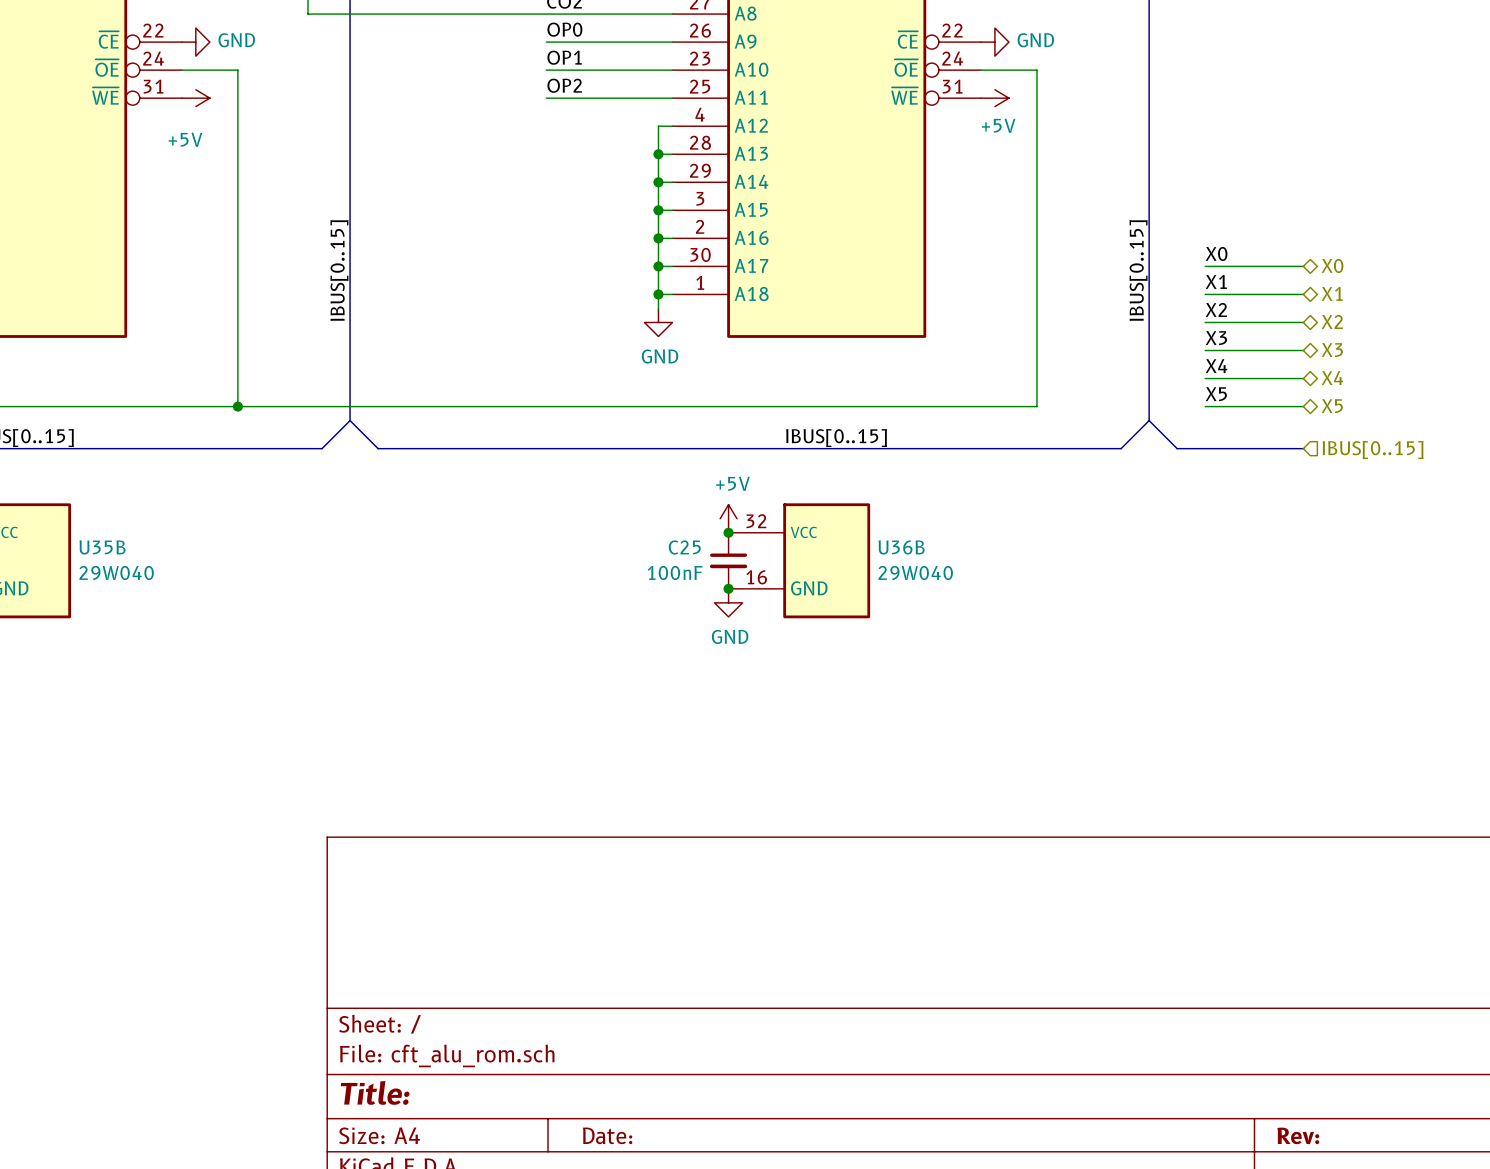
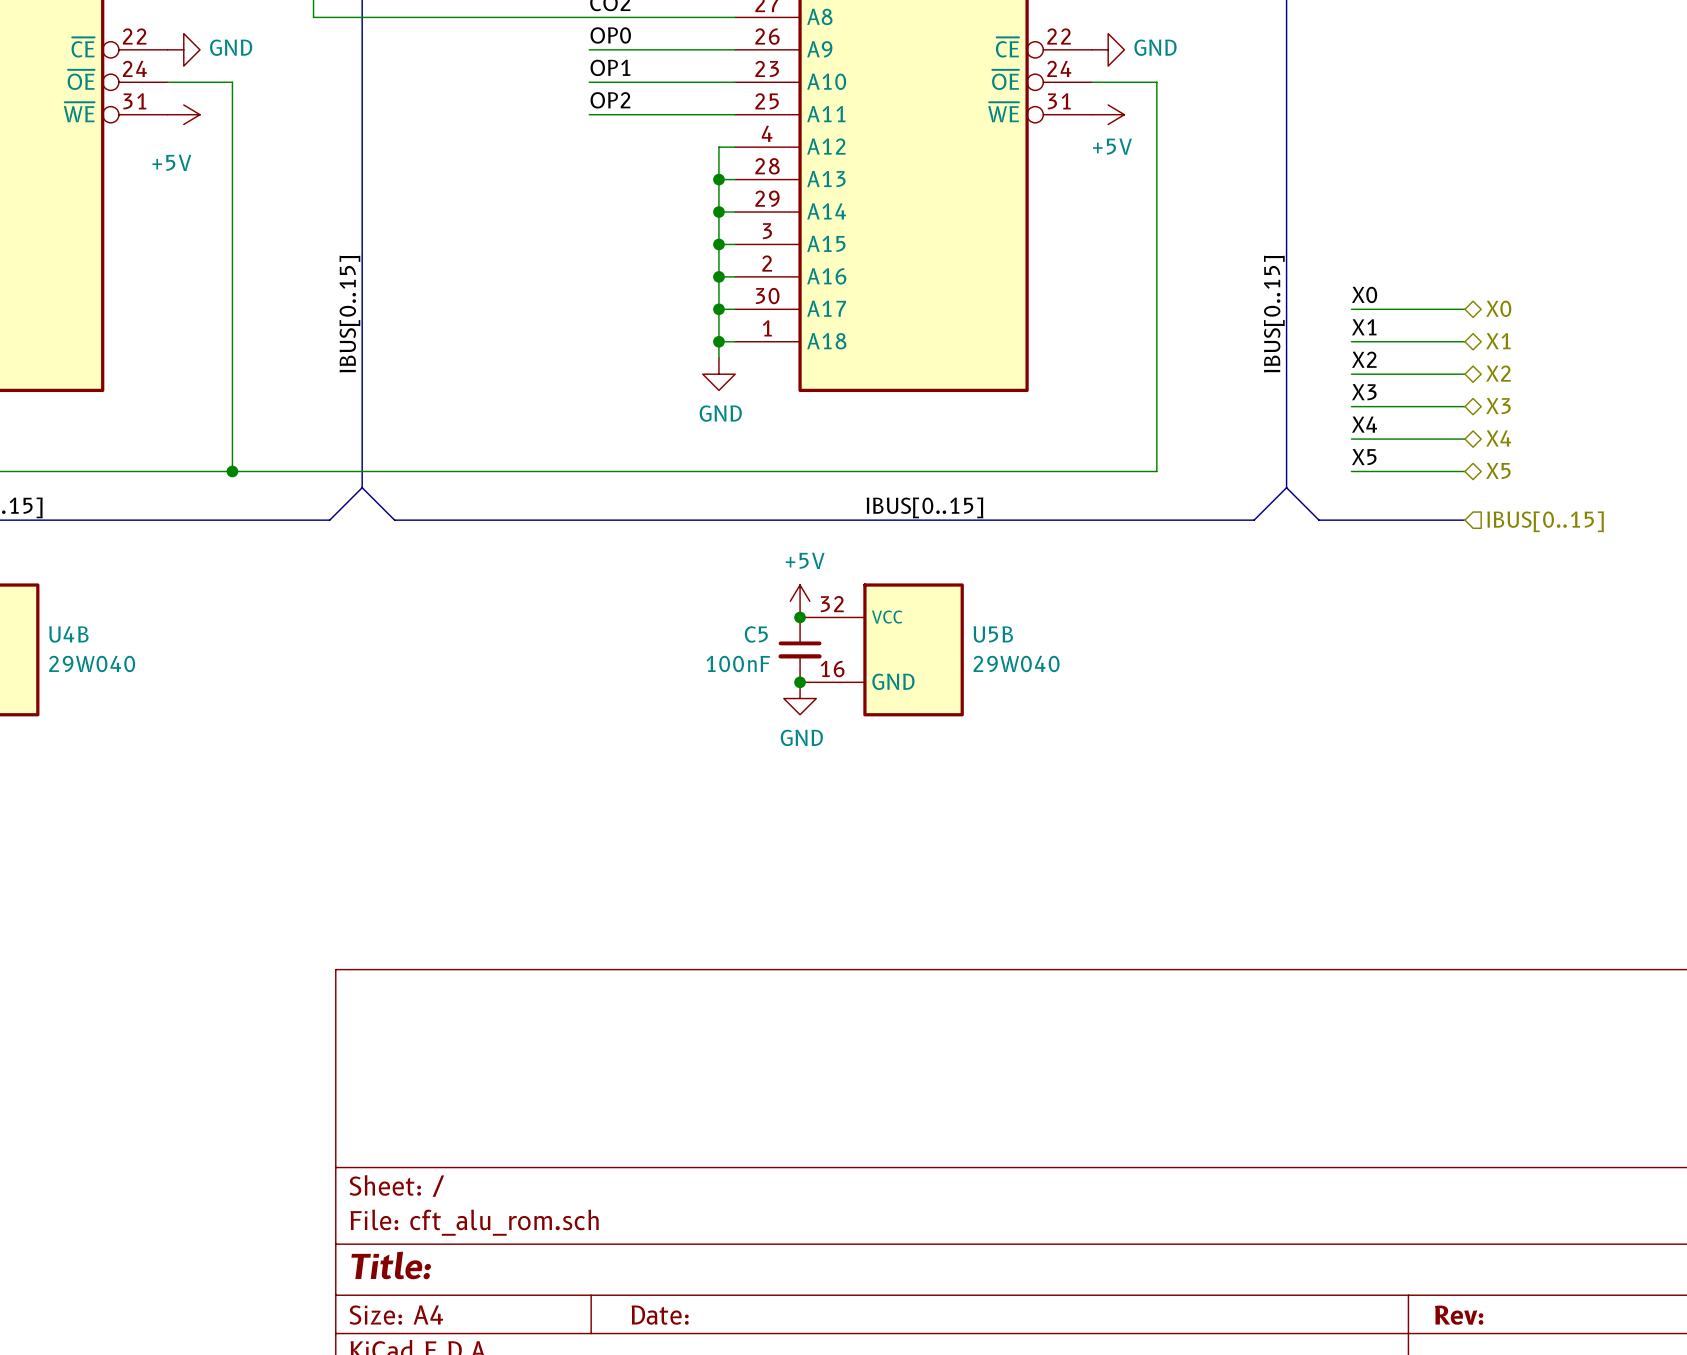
U35B name: U35B (102, 547) -> U4B (68, 634)
C25 name: C25 (684, 547) -> C5 (756, 634)
U36B name: U36B (901, 547) -> U5B (993, 634)

